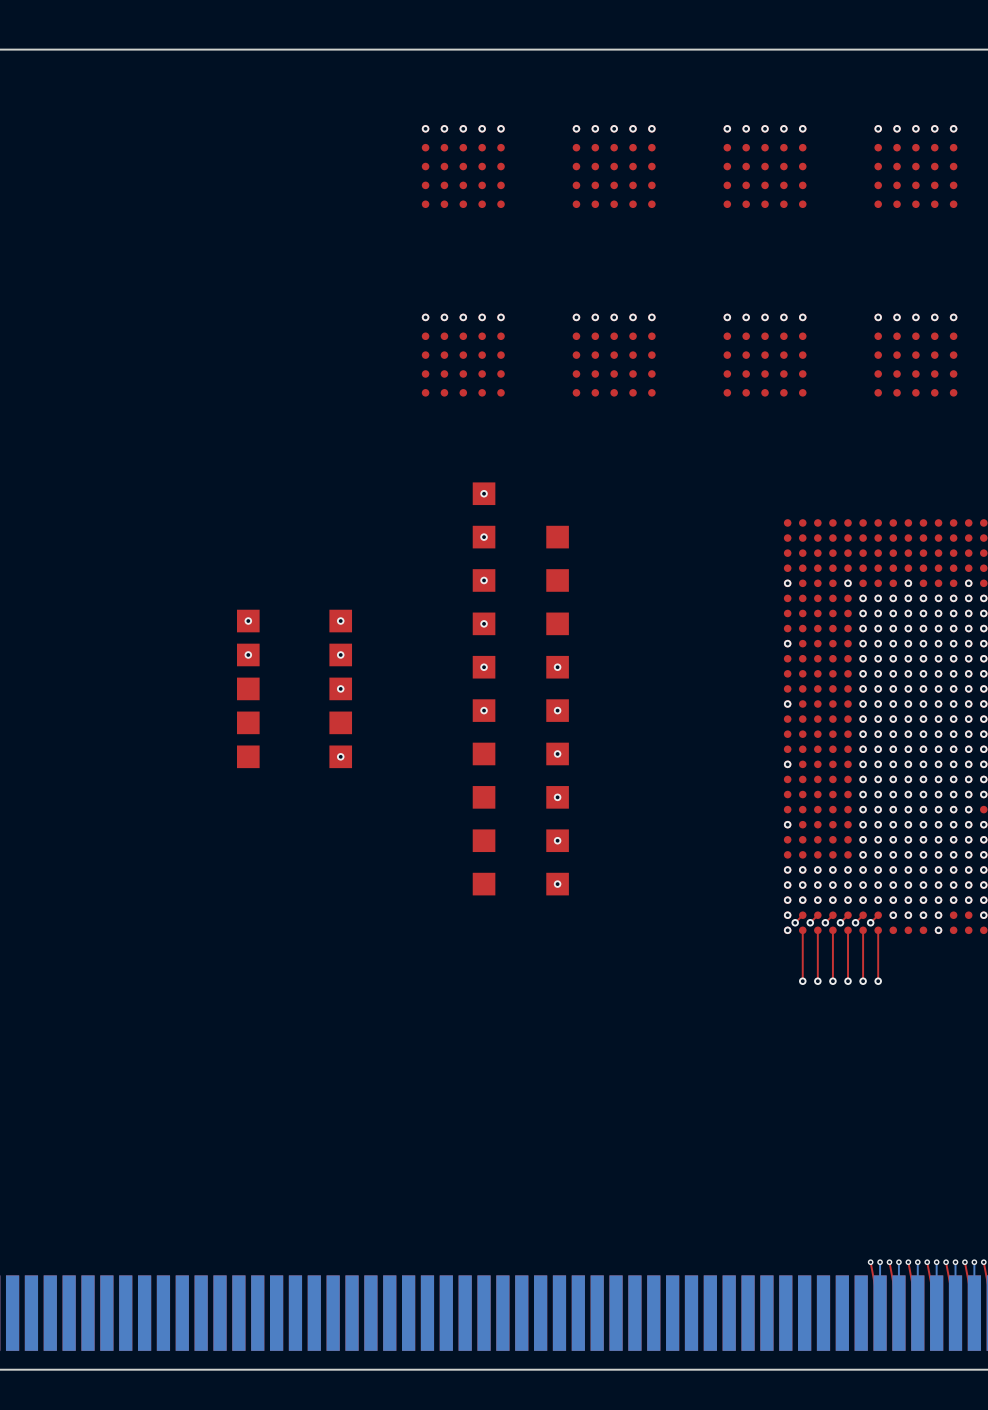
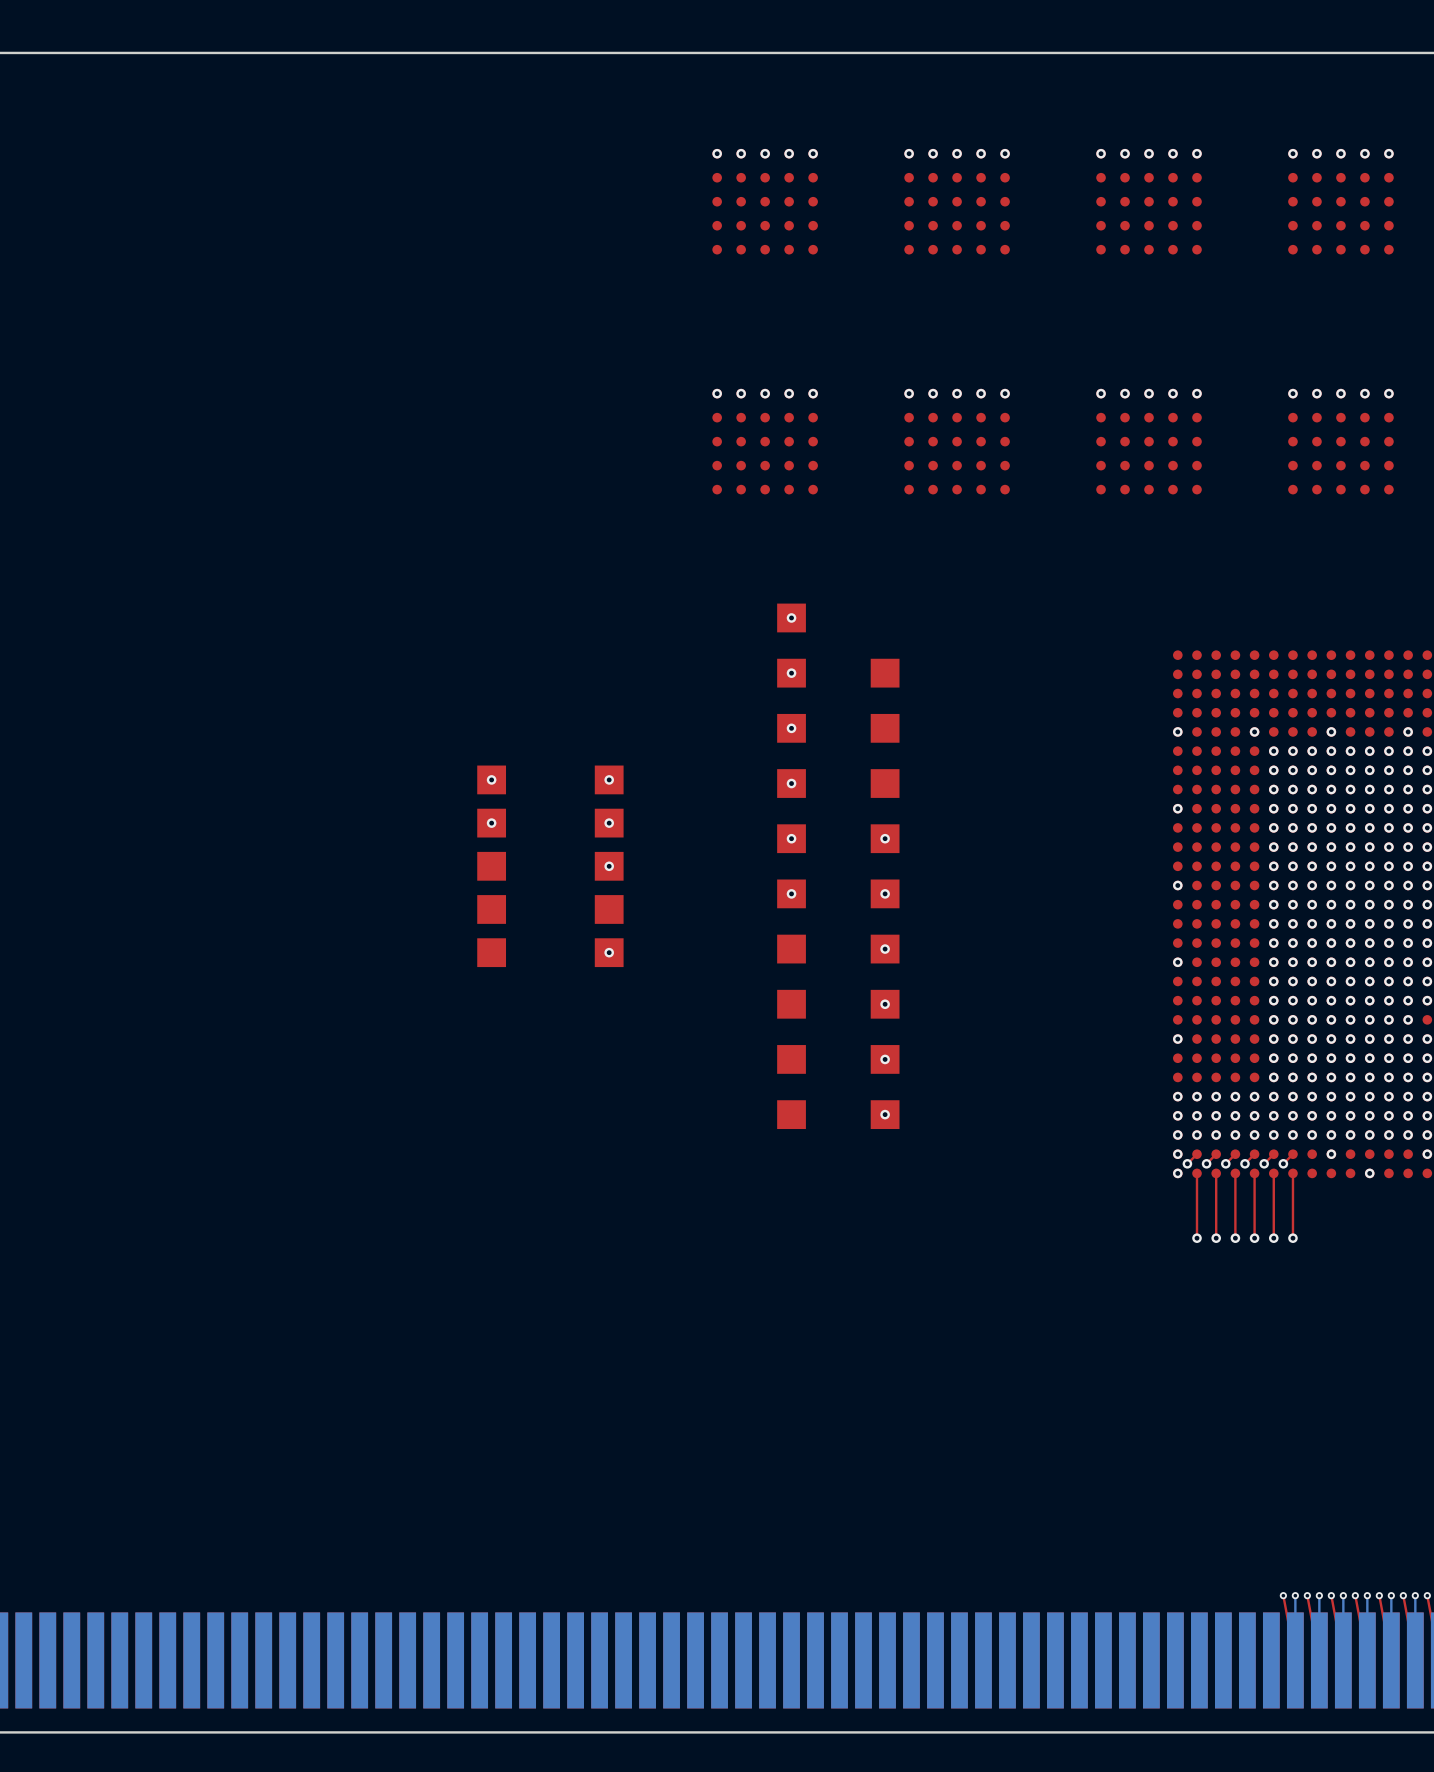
via: (893, 915) -> none
via: (923, 915) -> none
via: (938, 915) -> none

